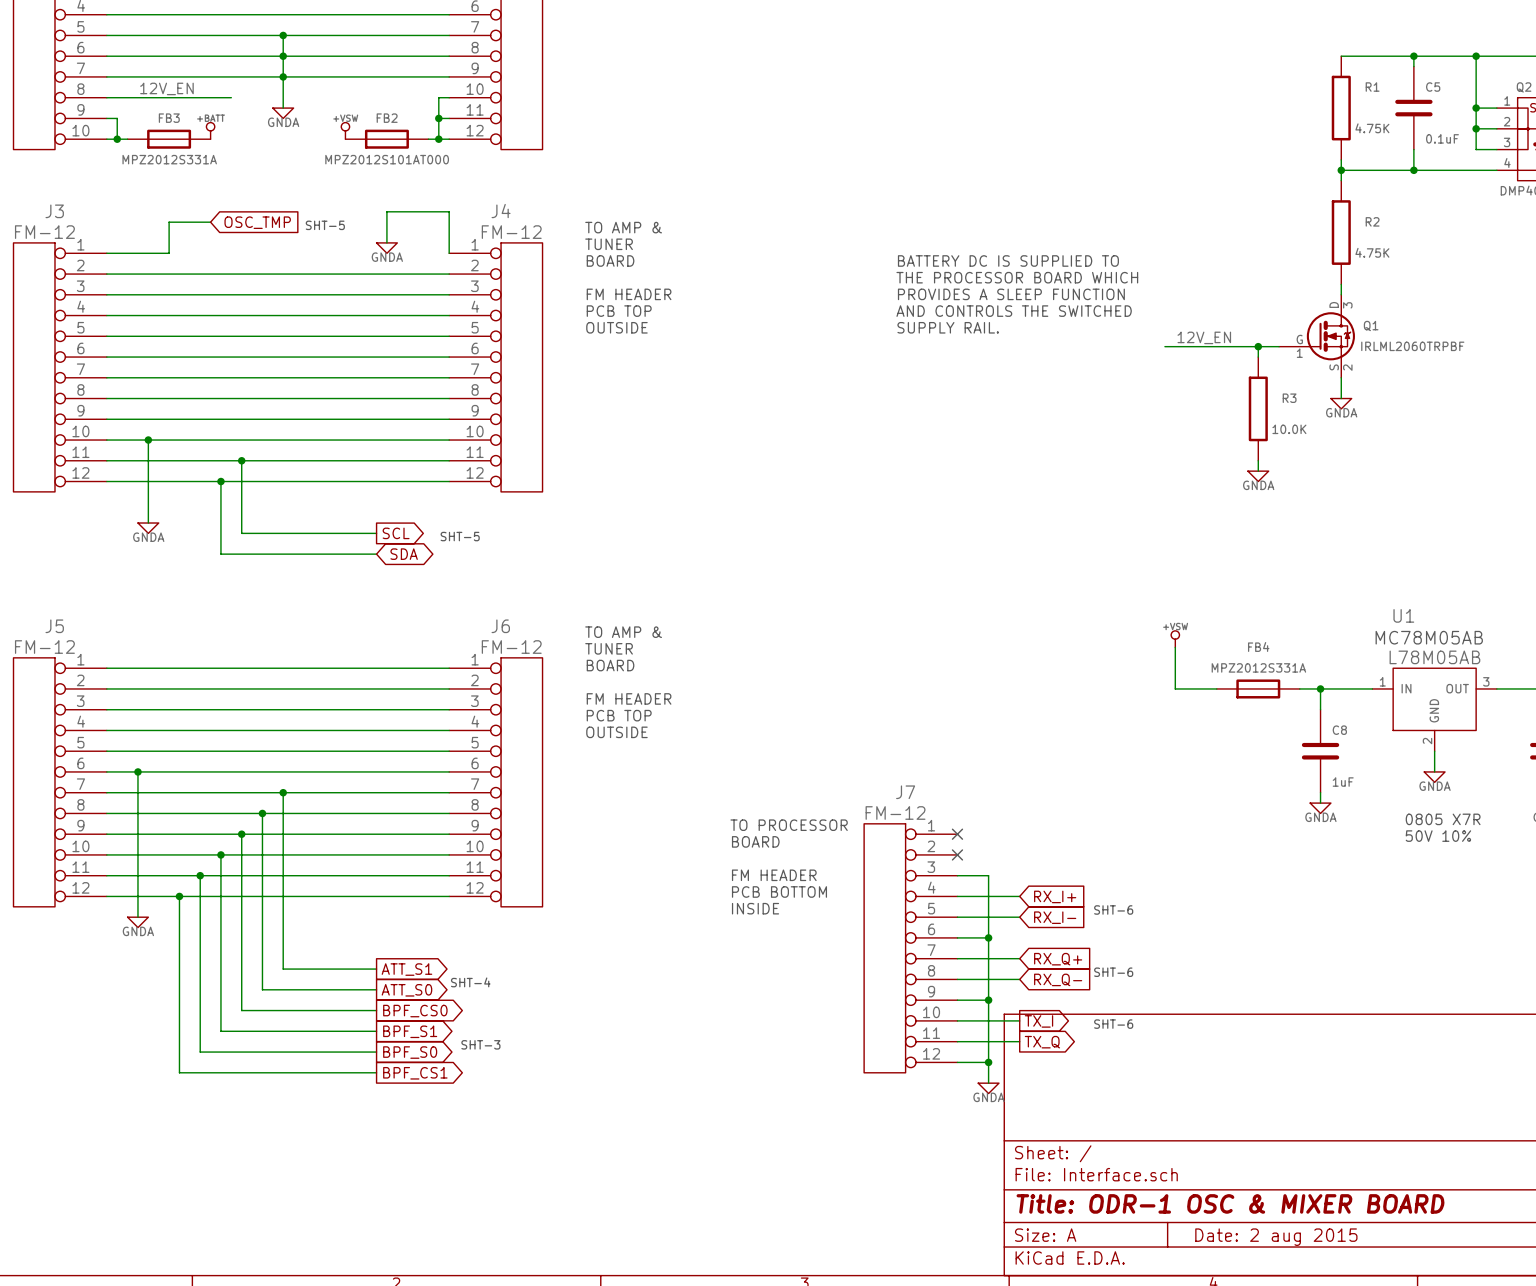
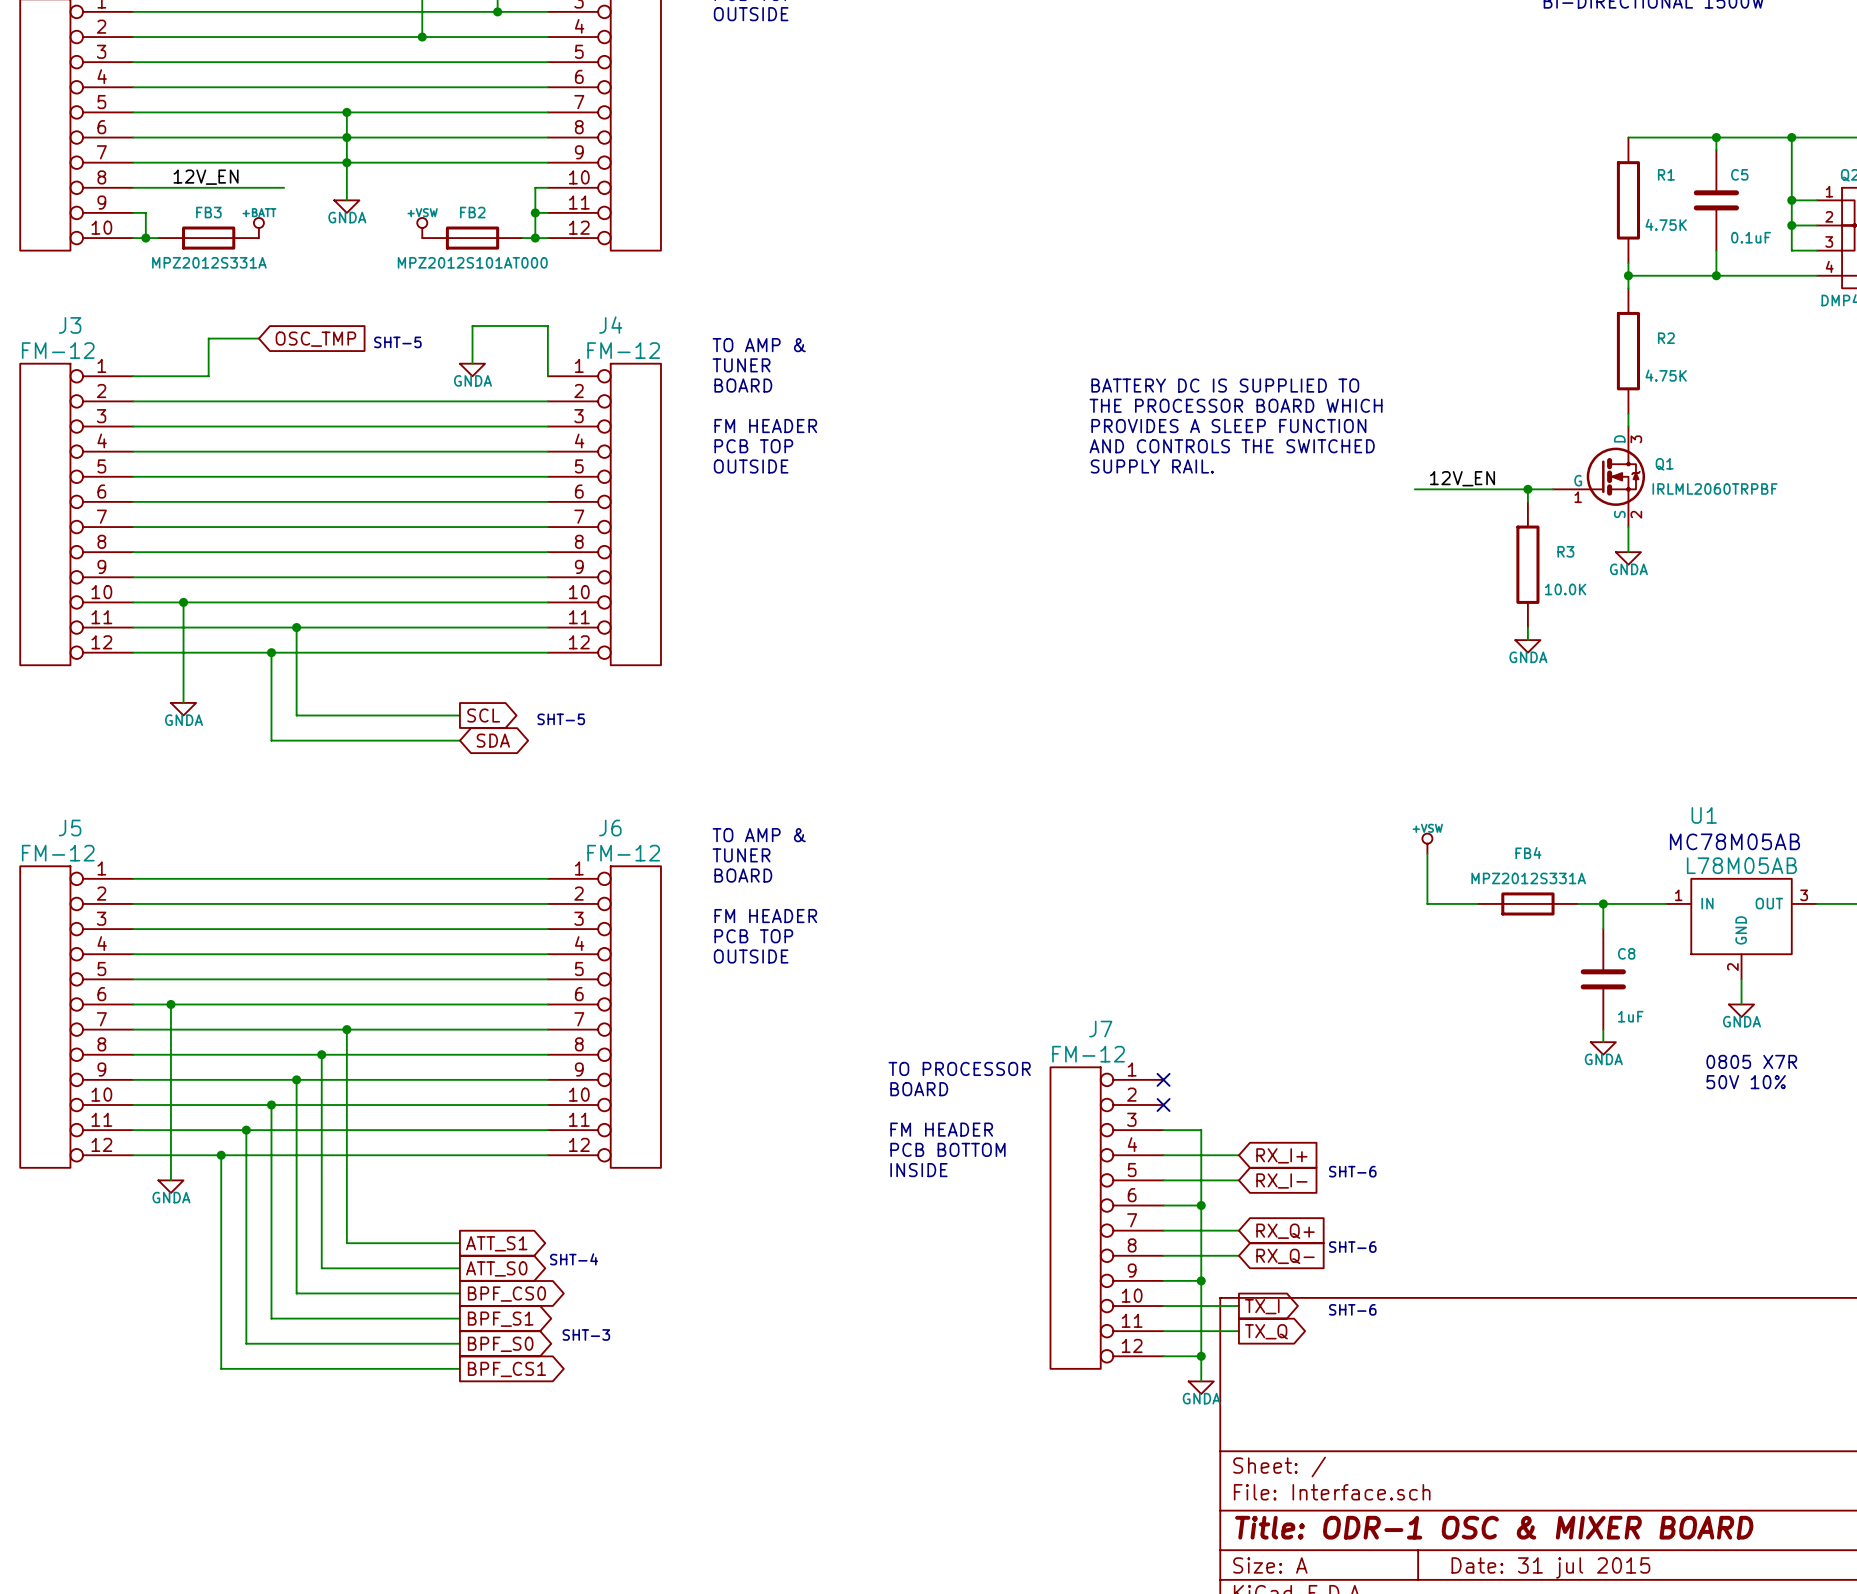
title block: Date: 2 aug 2015 (1276, 1237) -> Date: 31 jul 2015 (1550, 1567)

